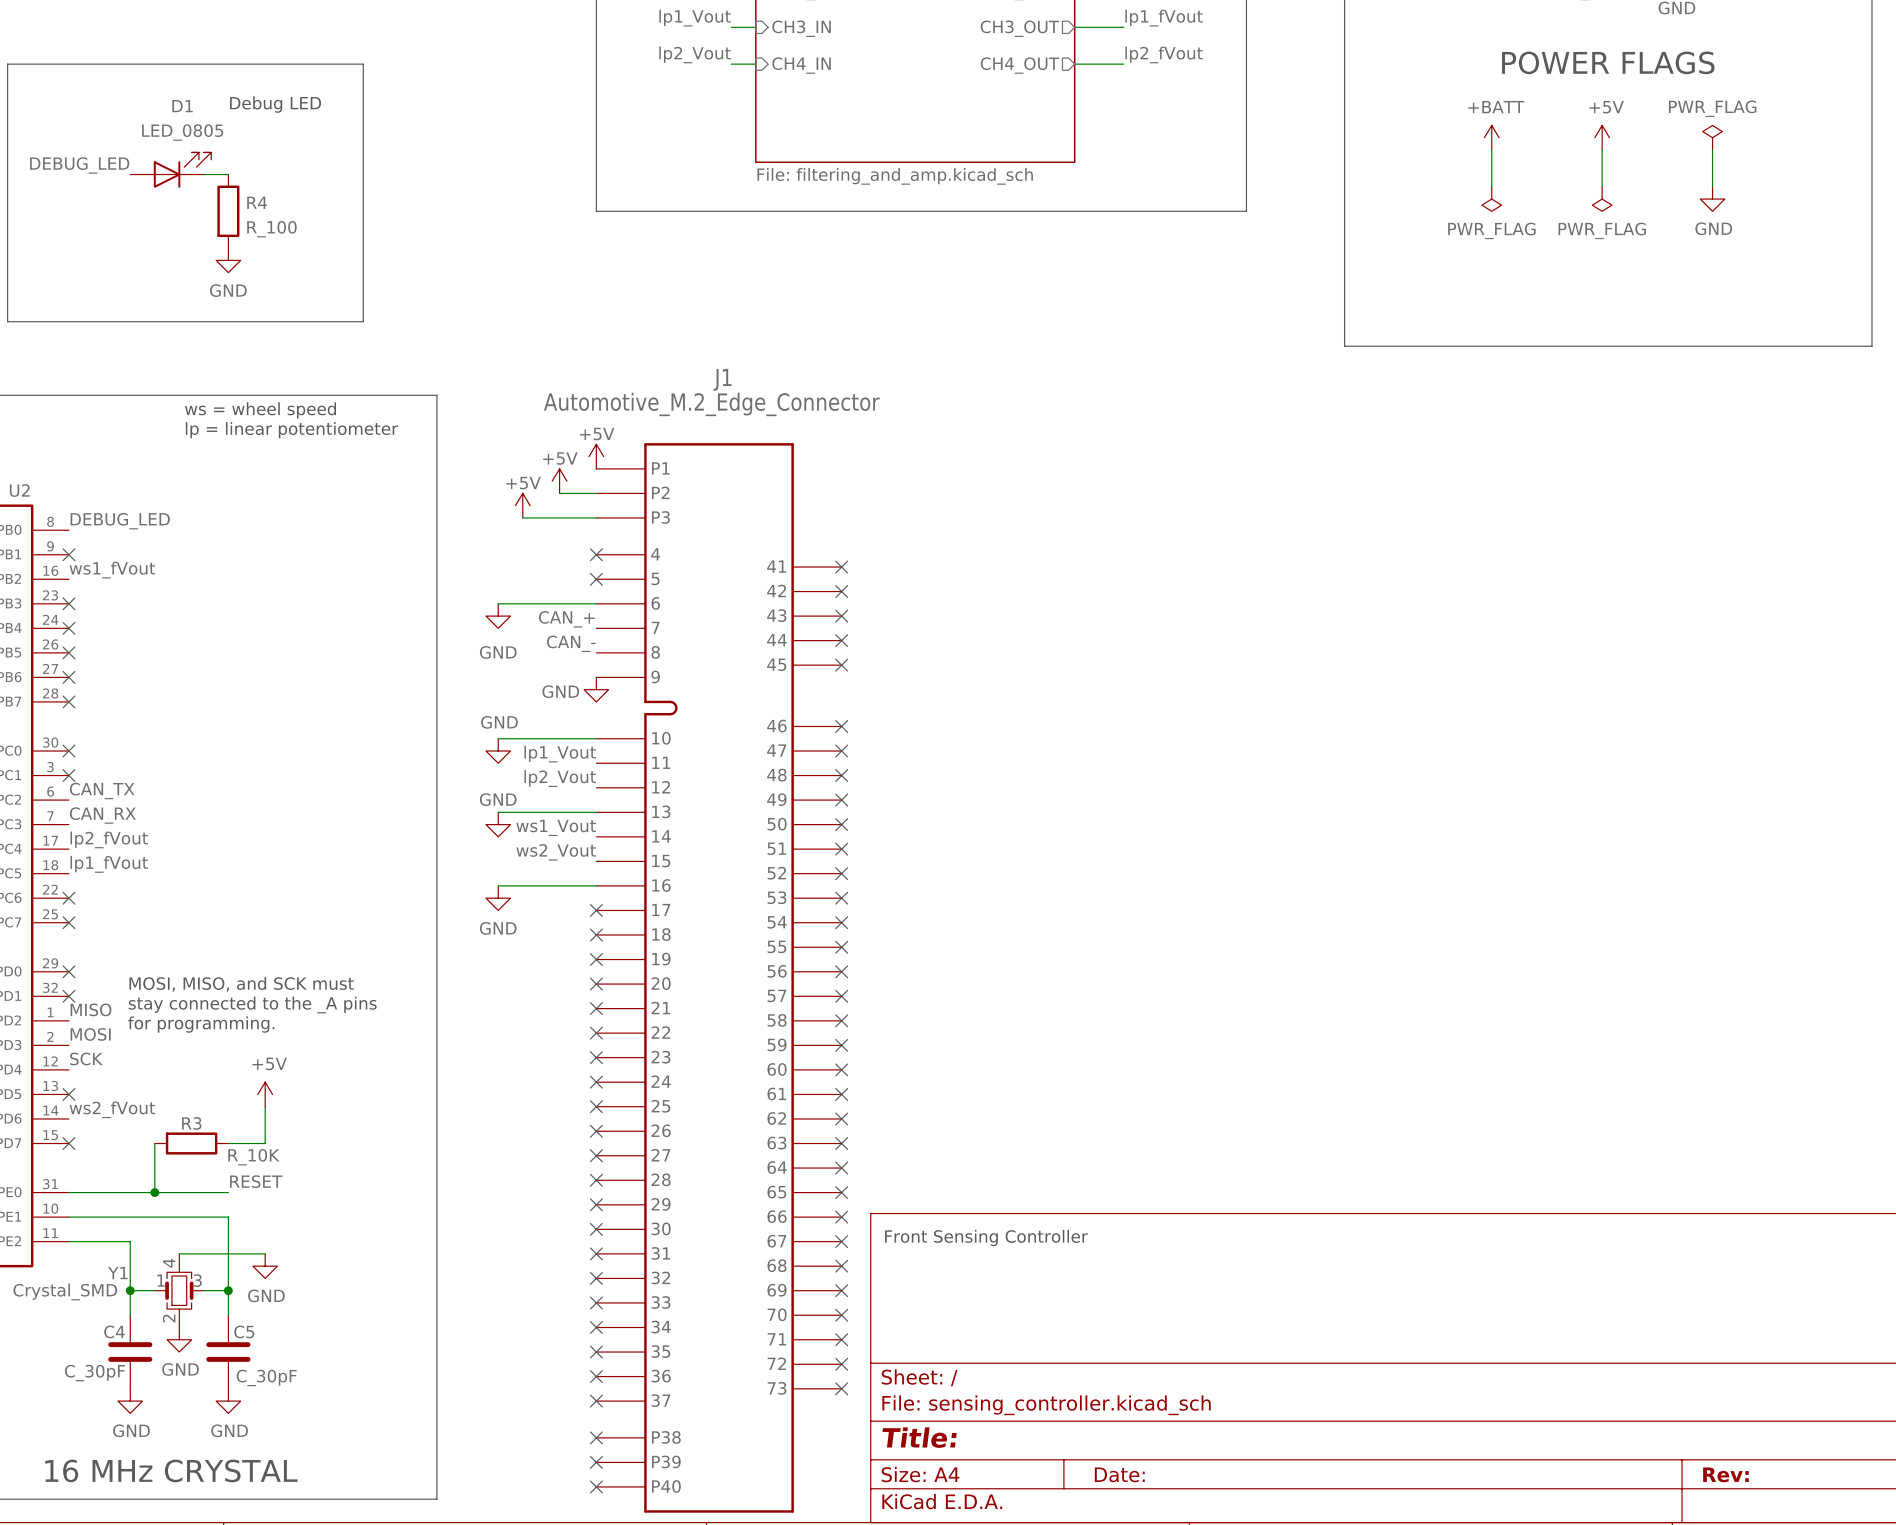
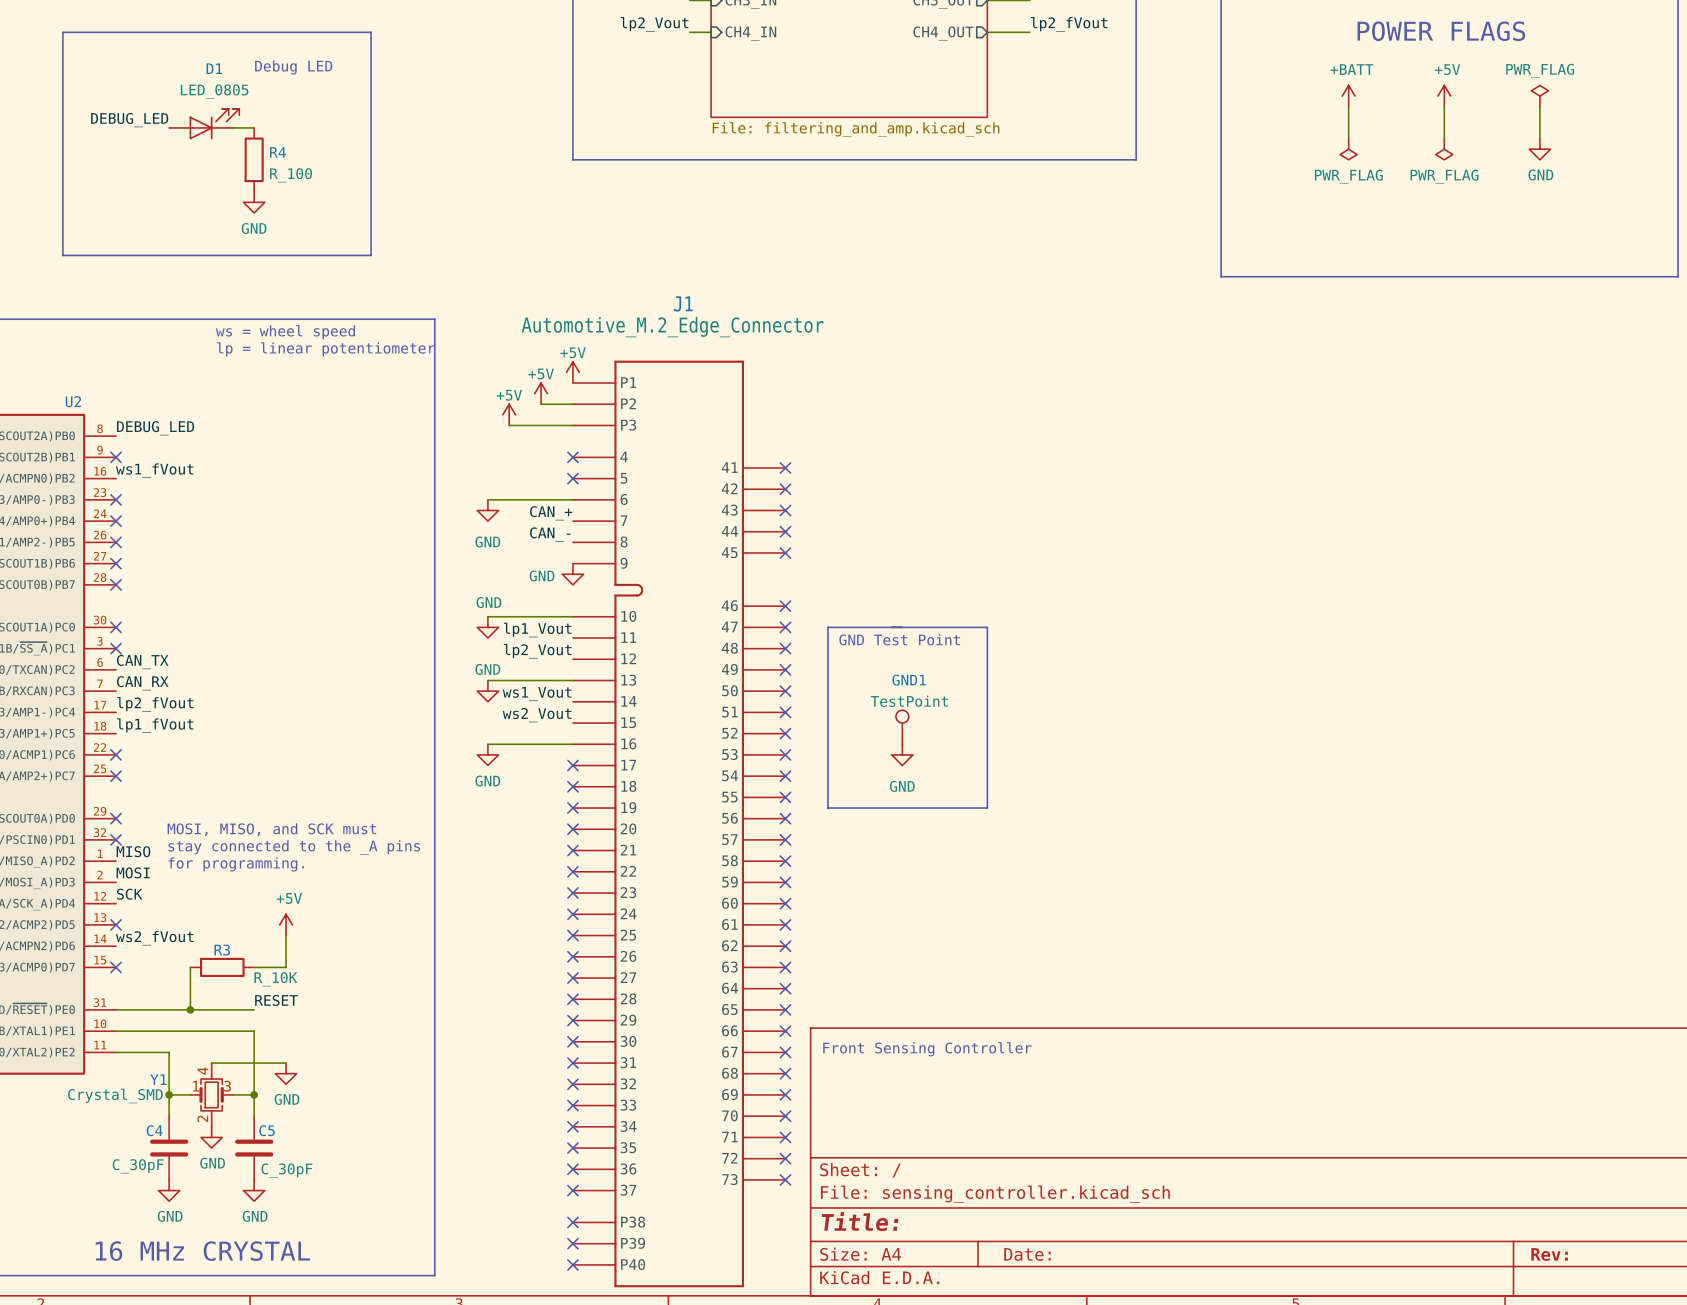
line: none -> (827, 627) (987, 627) (987, 808) (827, 808) (827, 627)
text: none -> GND Test Point (899, 639)
GND1: none -> TestPoint (902, 727)
power symbol: none -> GND (902, 754)

